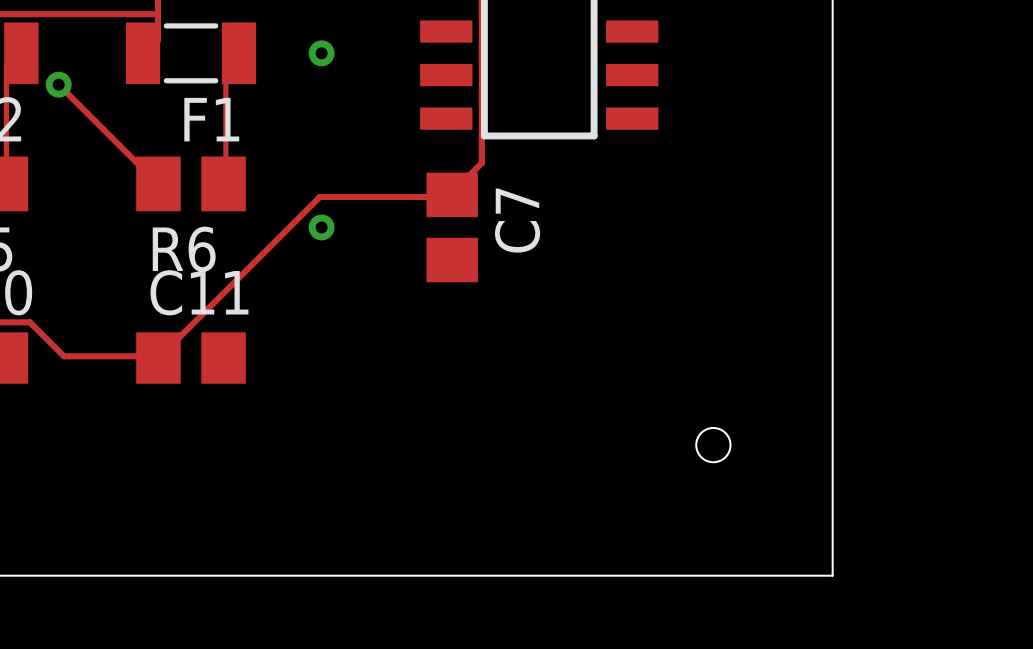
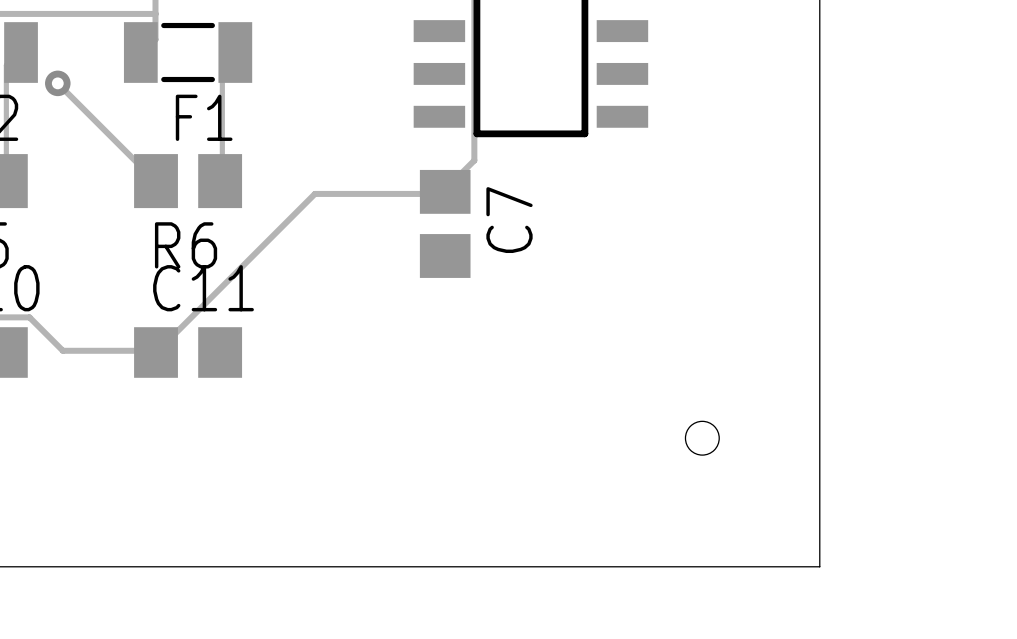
via: (321, 53) -> none
via: (321, 227) -> none

